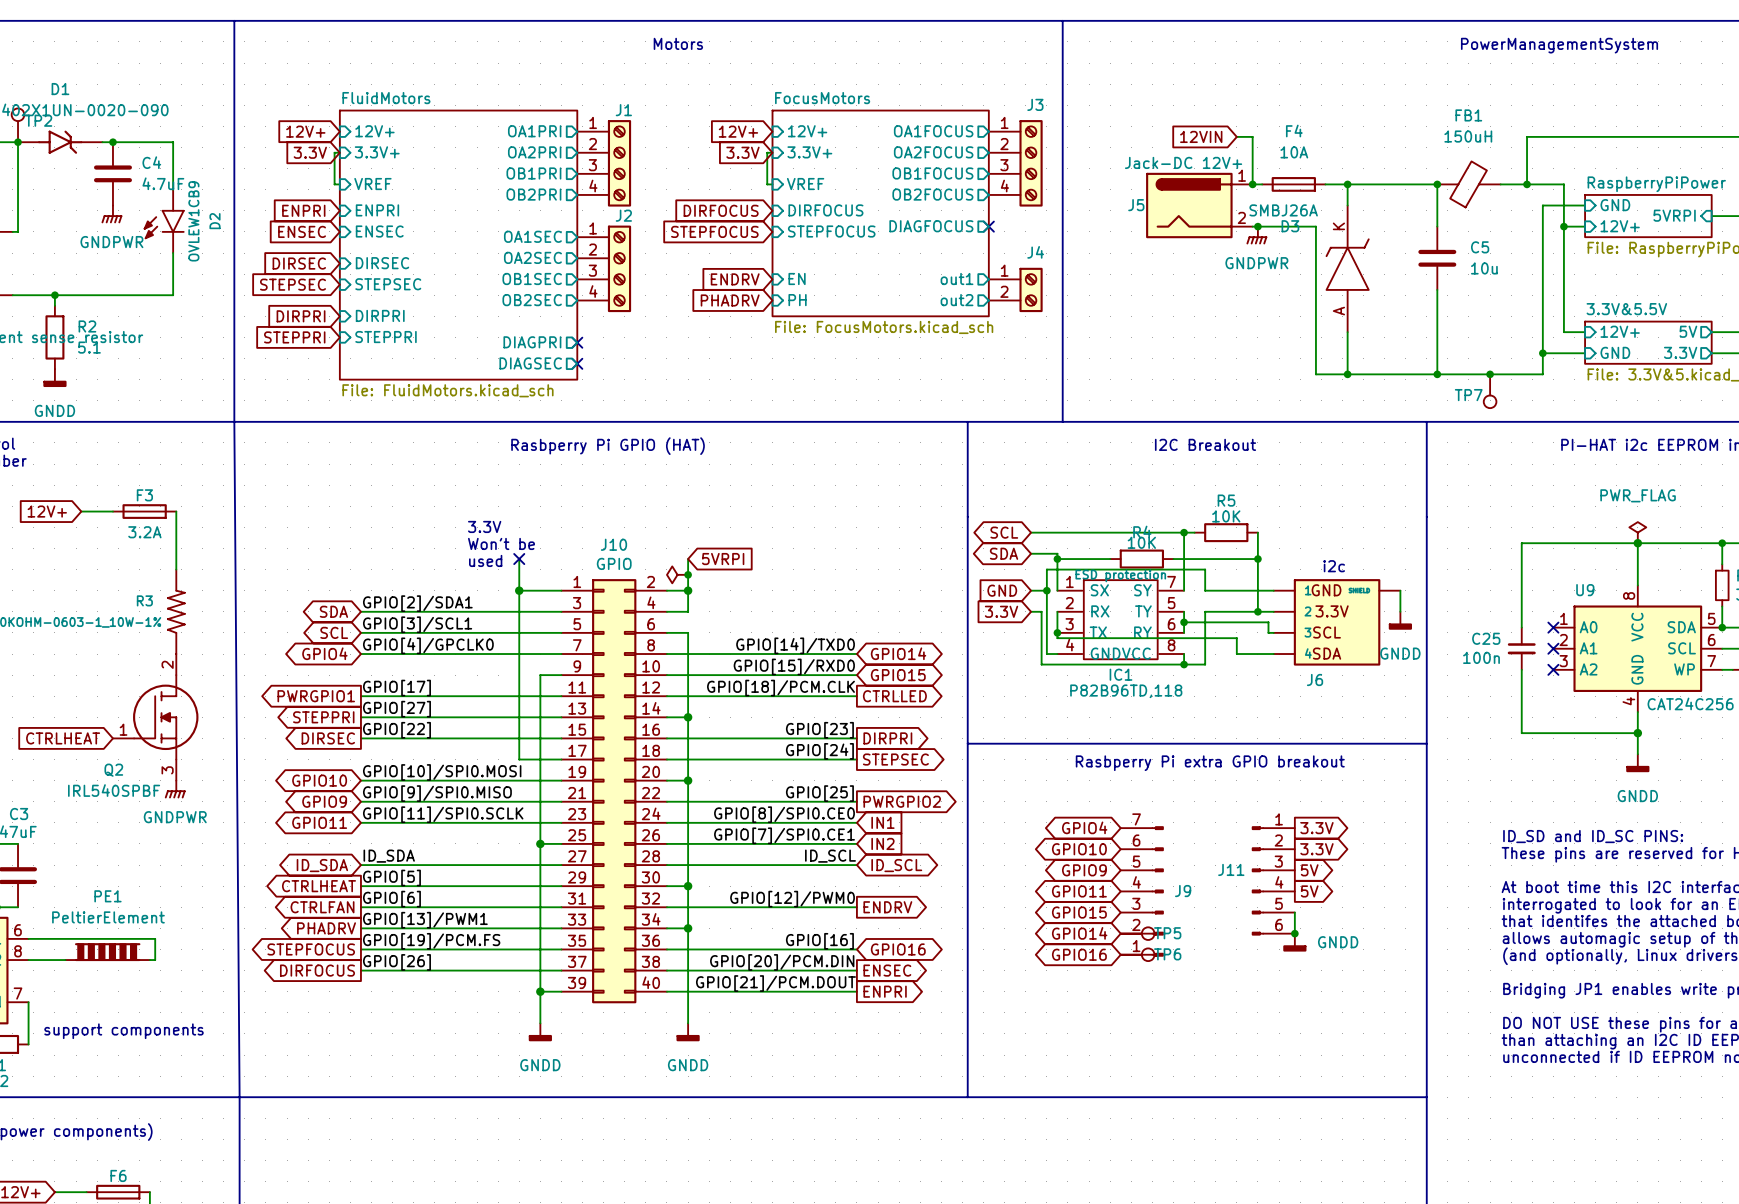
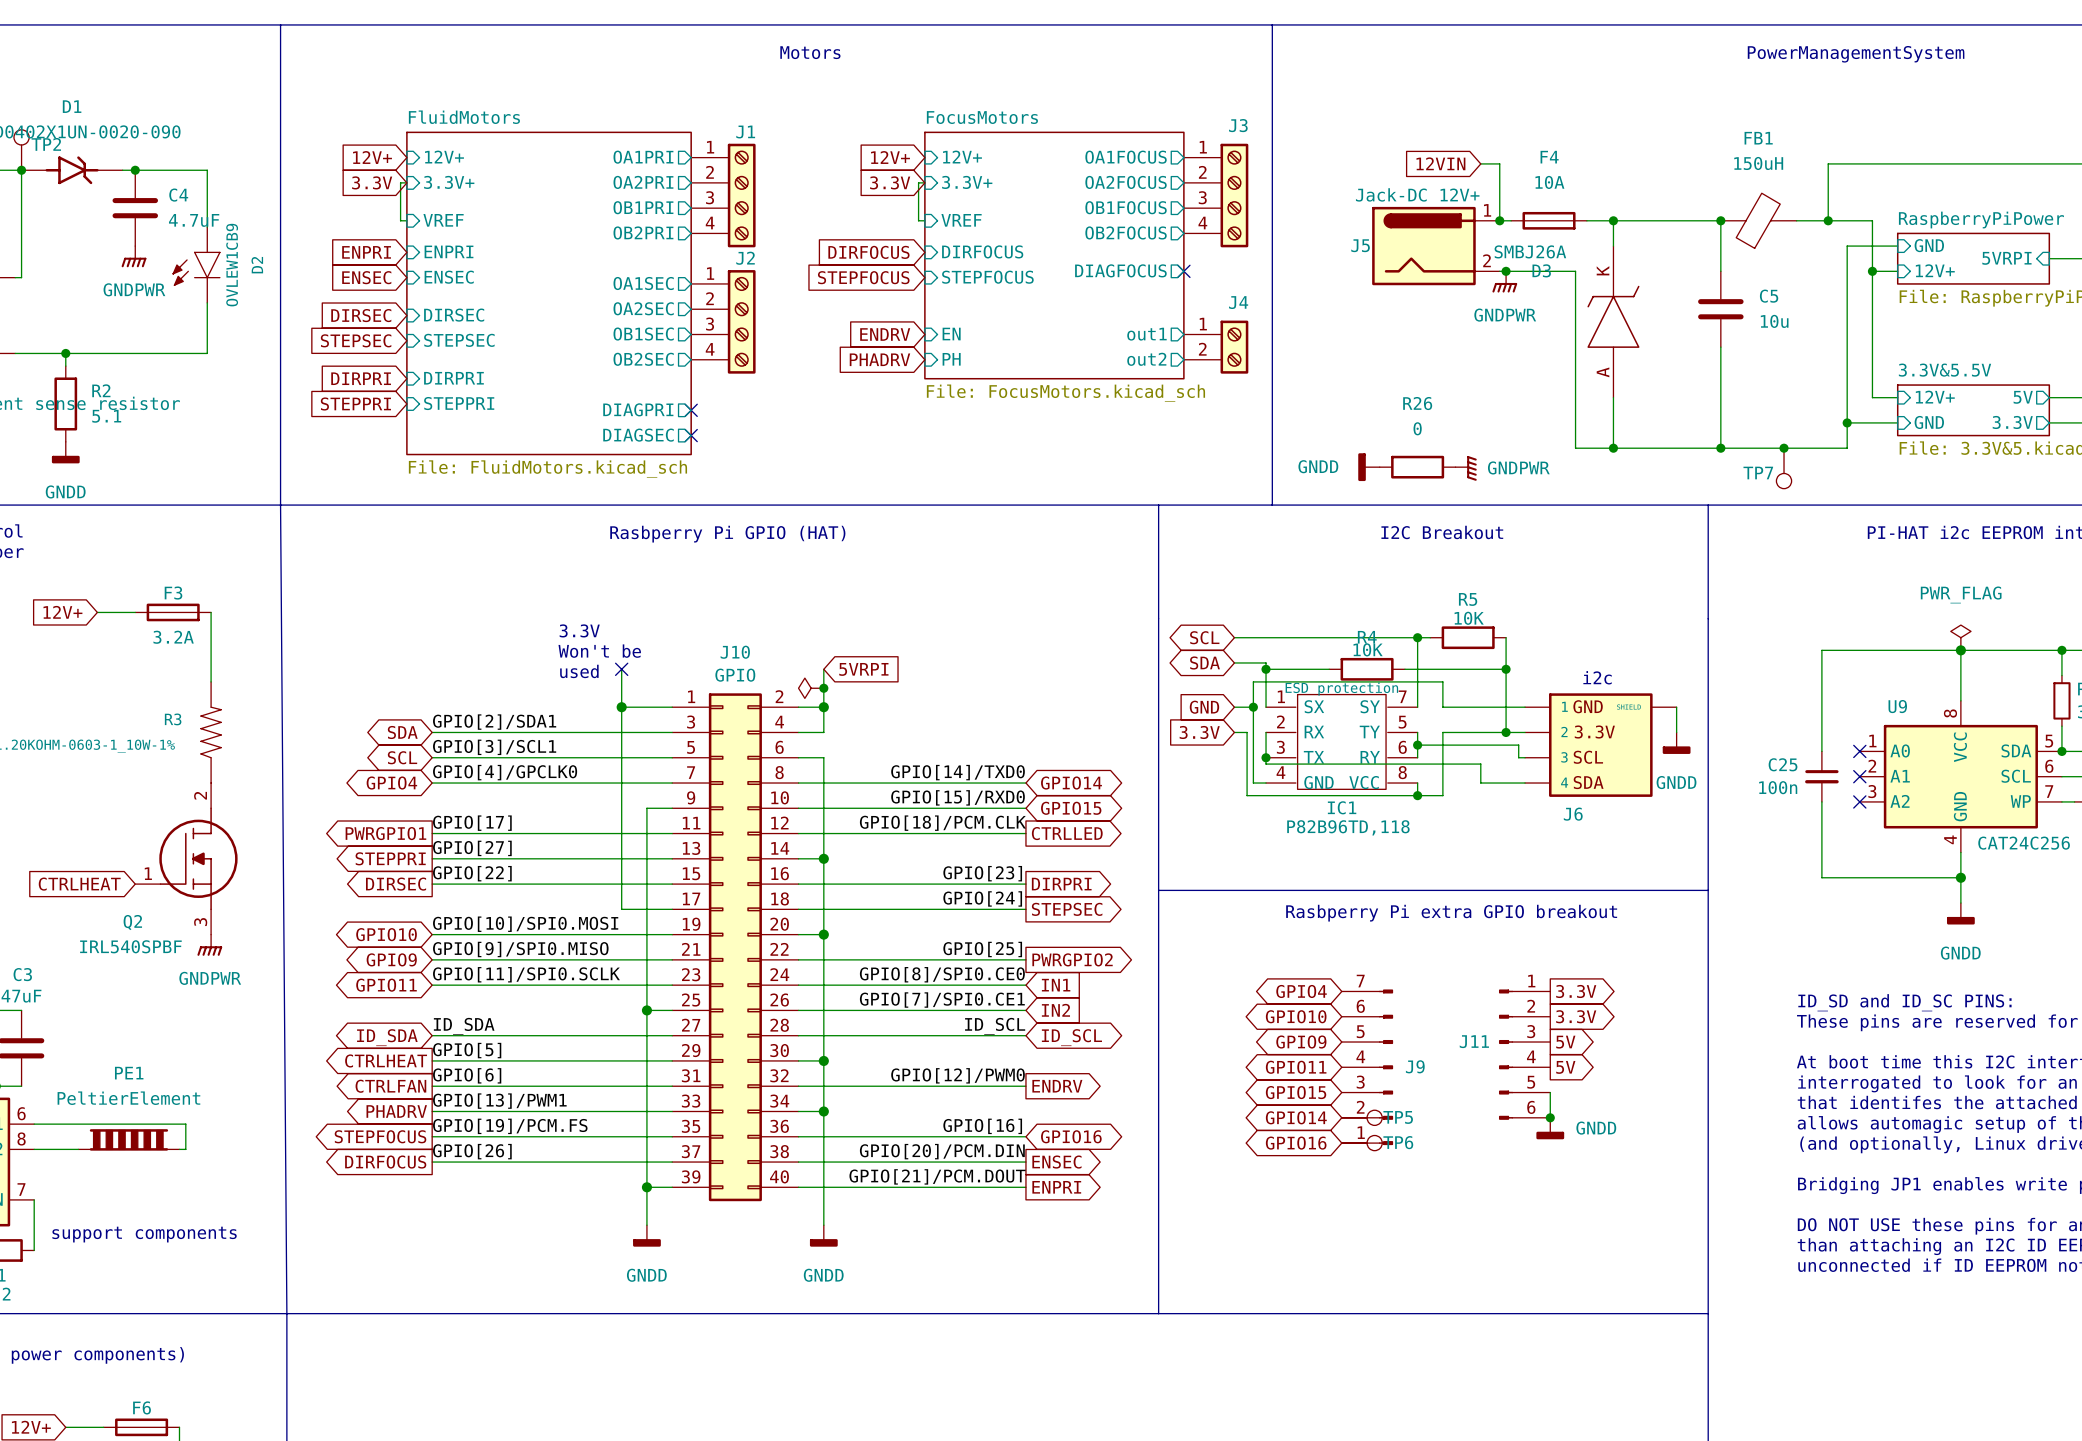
power symbol: none -> GNDD (1368, 467)
R26: none -> 0 (1417, 467)
power symbol: none -> GNDPWR (1466, 468)

